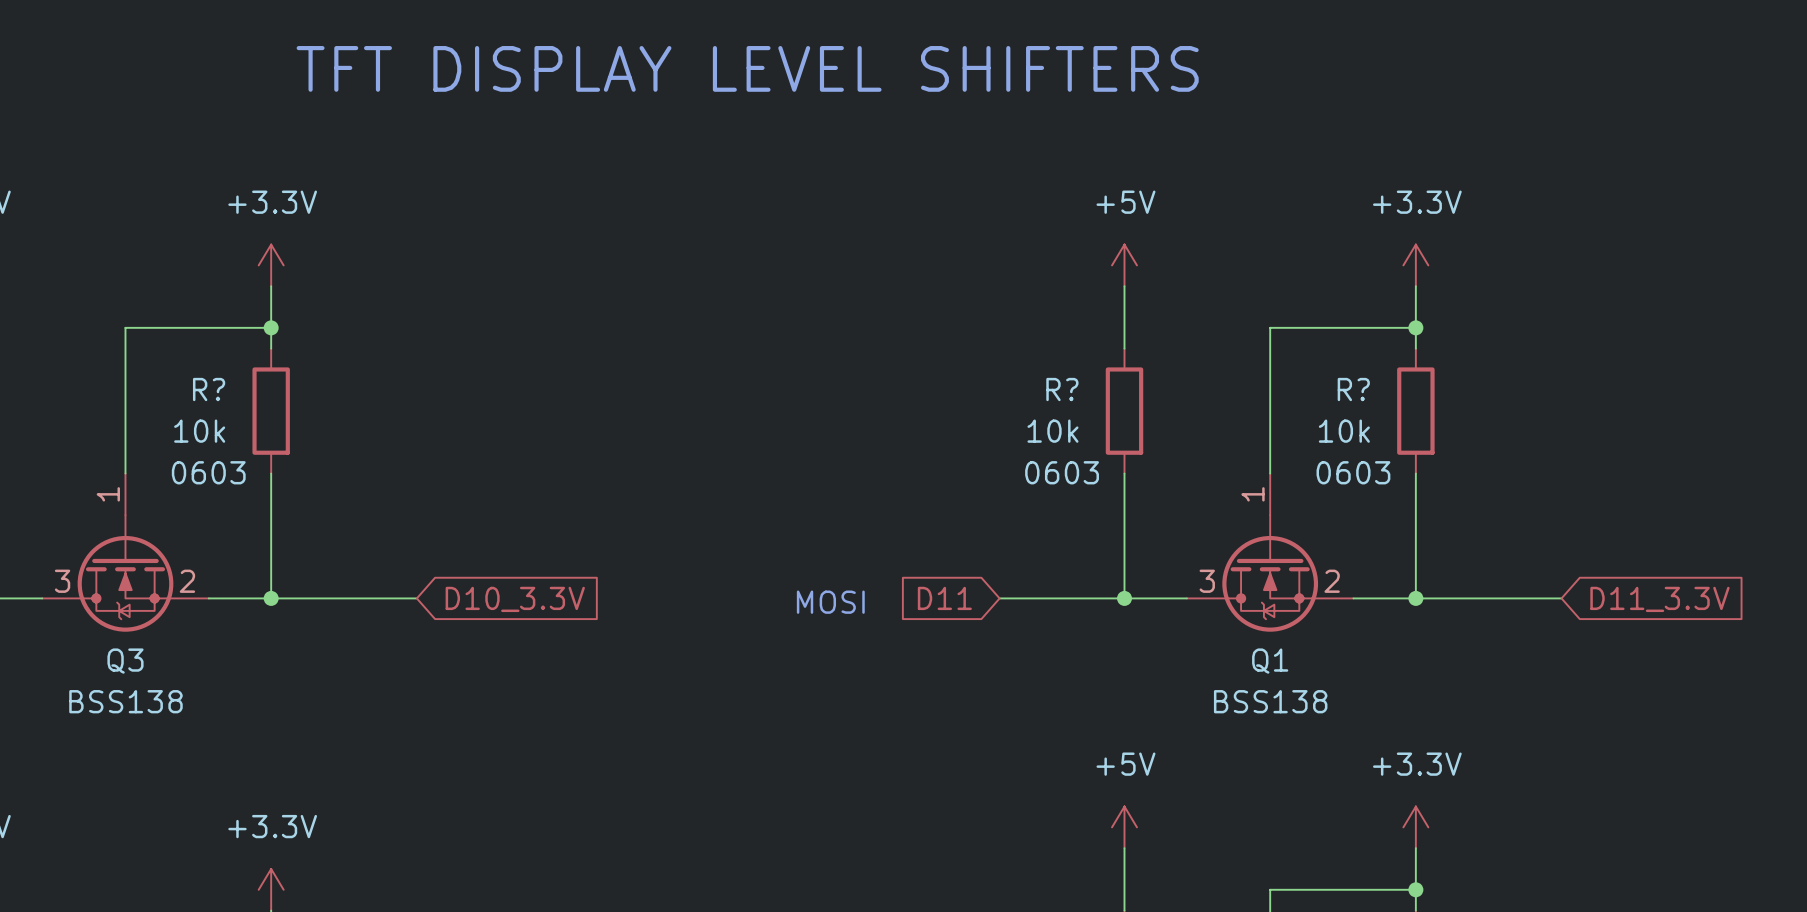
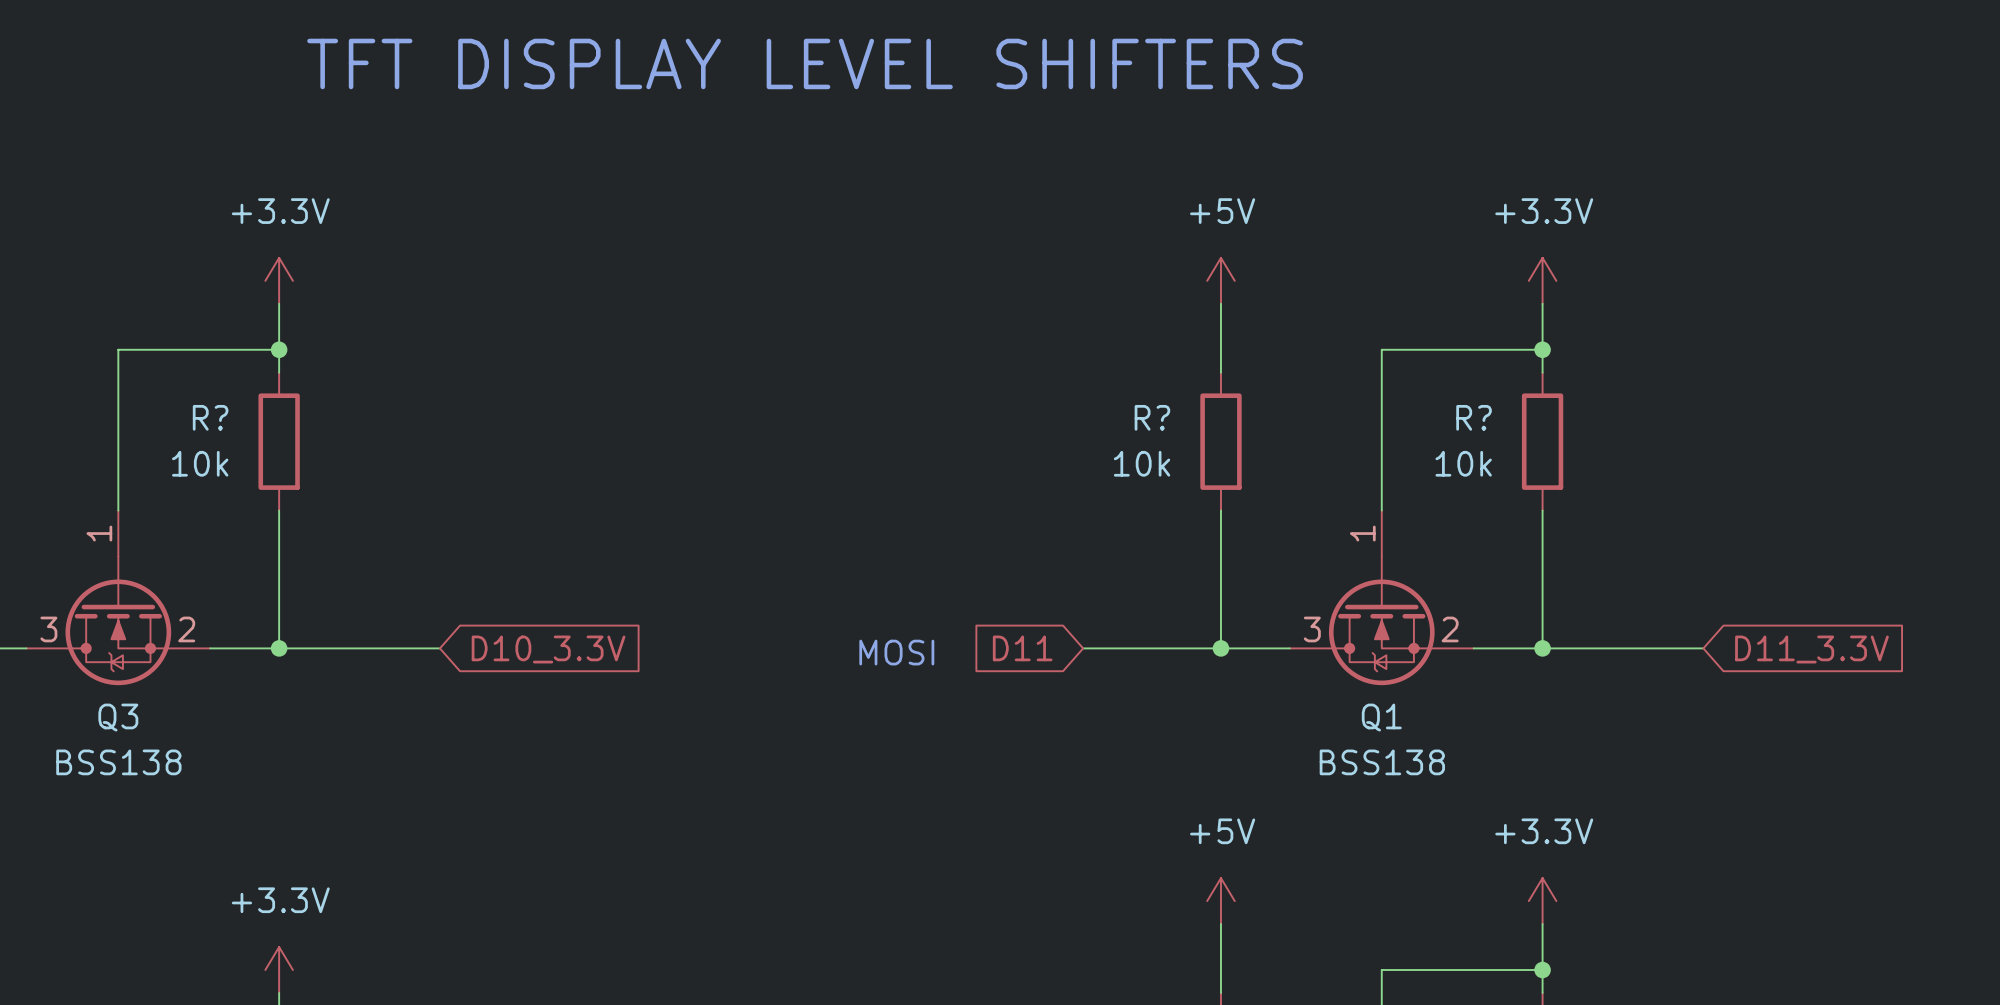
R? text: 0603 (208, 472) -> none
R? text: 0603 (1062, 472) -> none
R? text: 0603 (1353, 472) -> none

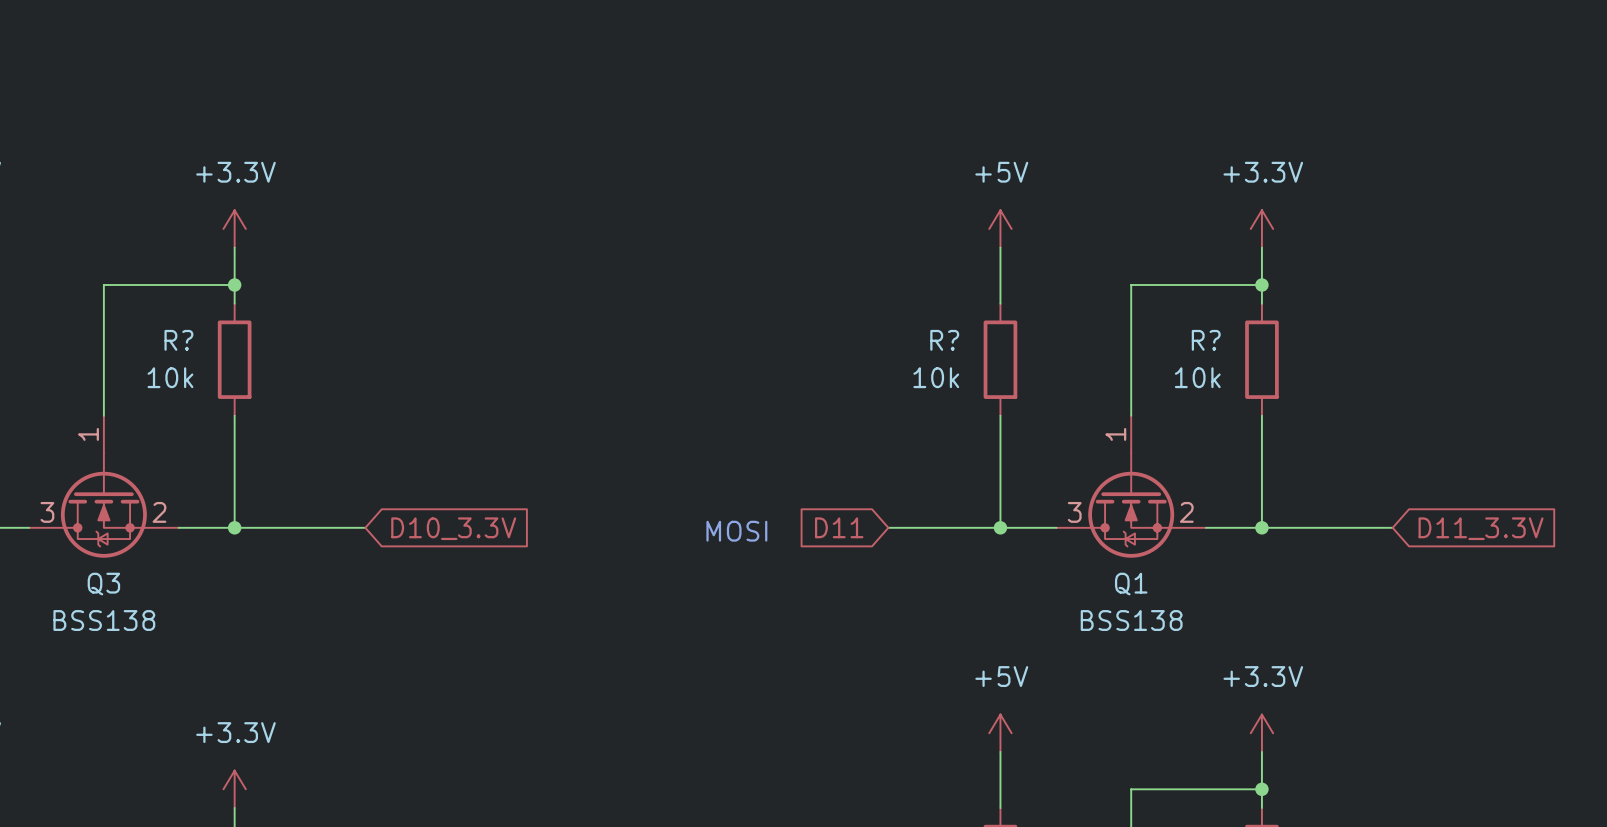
text: TFT DISPLAY LEVEL SHIFTERS (805, 63) -> none

